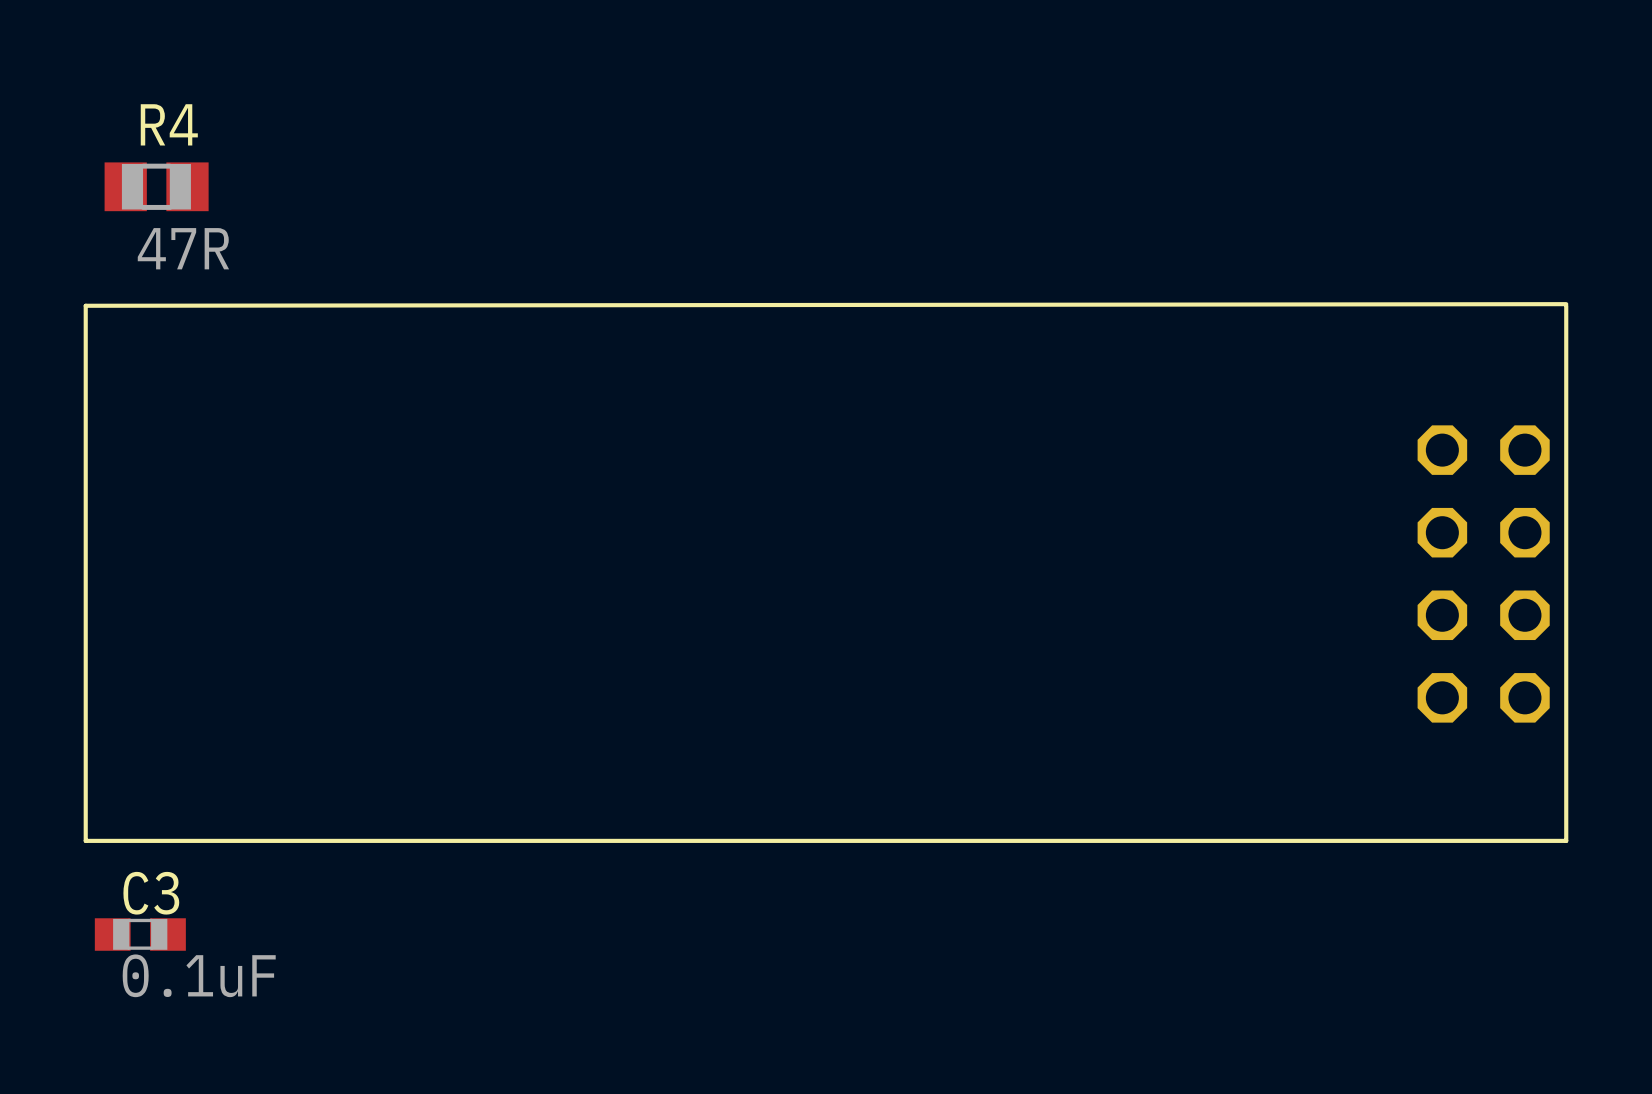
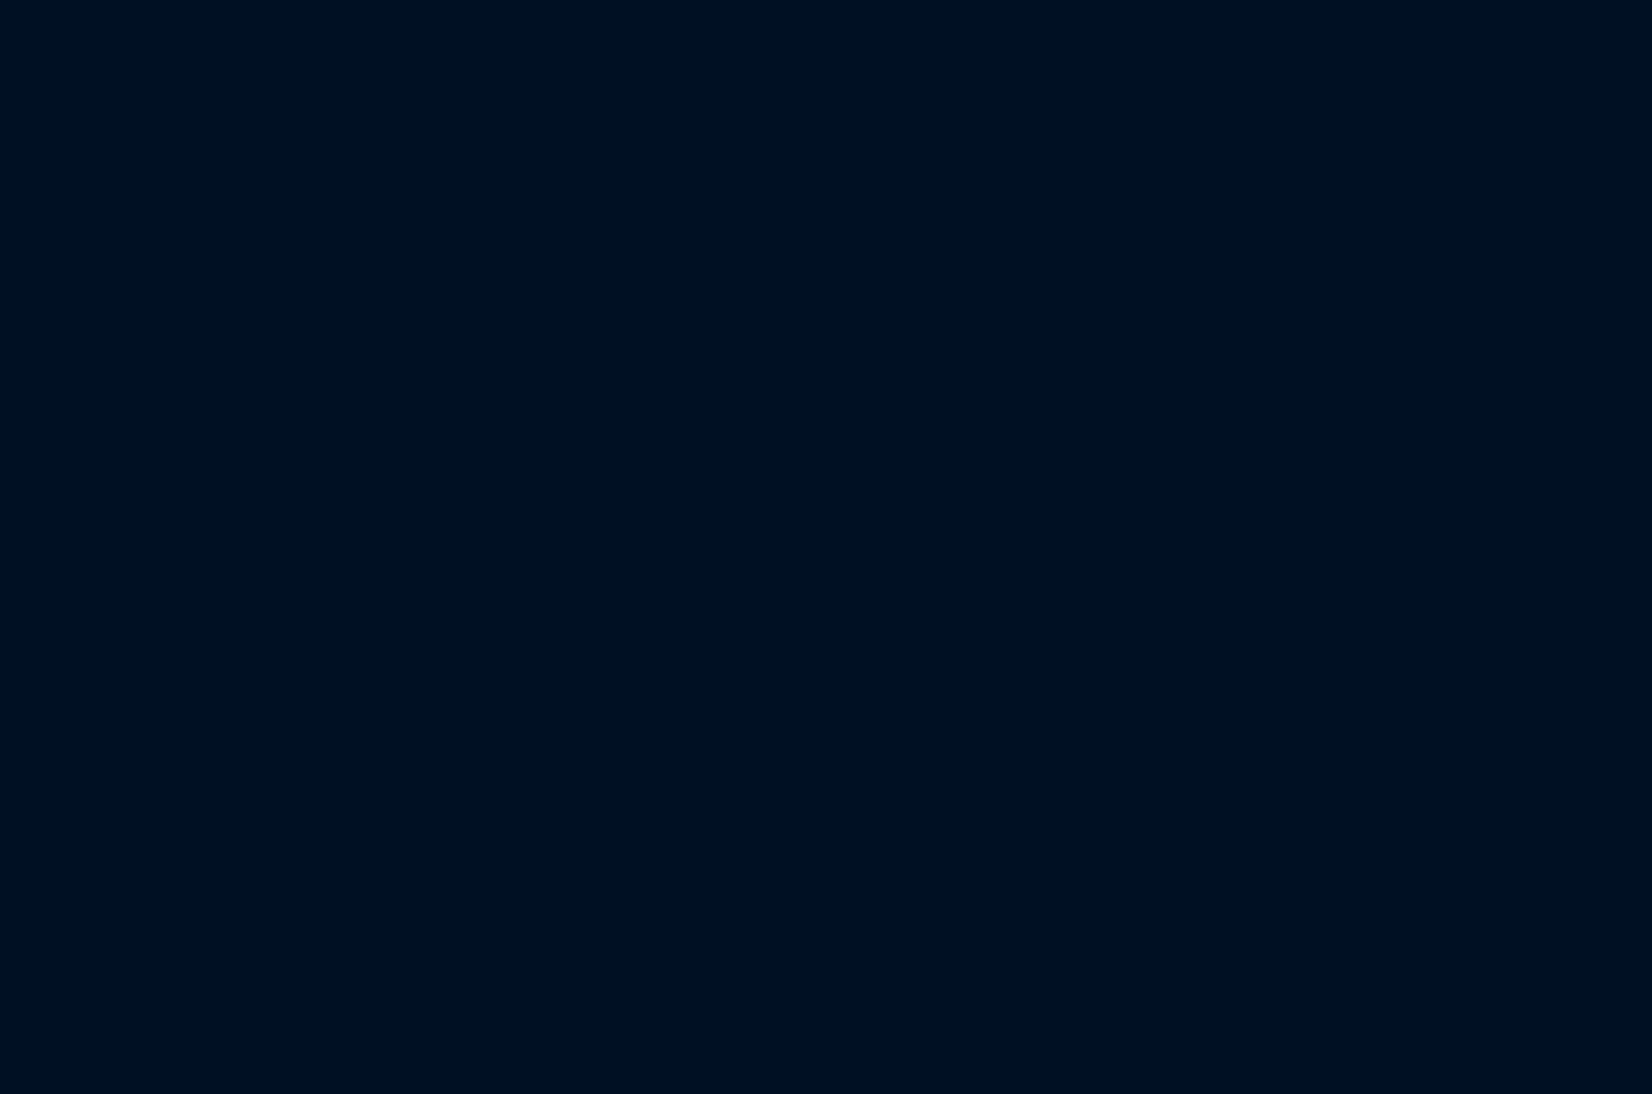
R4: 47R (156, 186) -> none
part: (825, 572) -> none
C3: 0.1uF (140, 934) -> none

